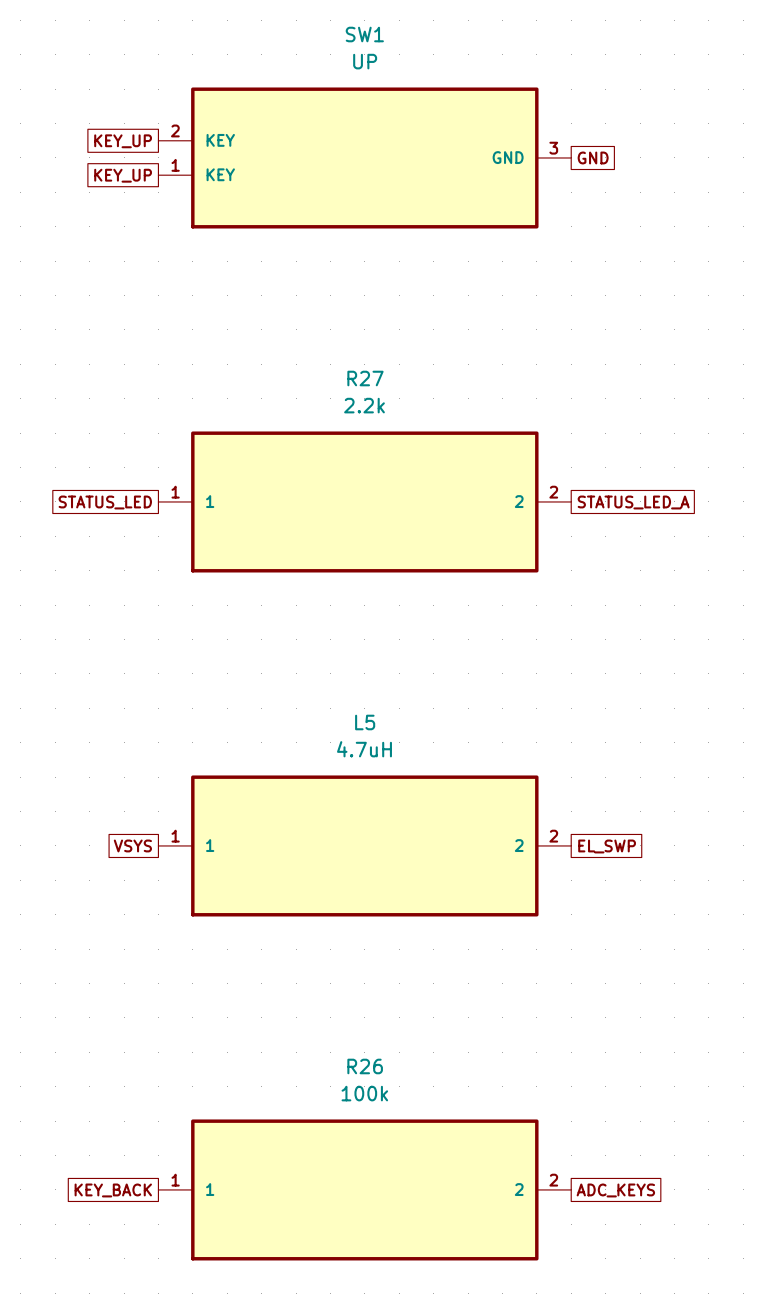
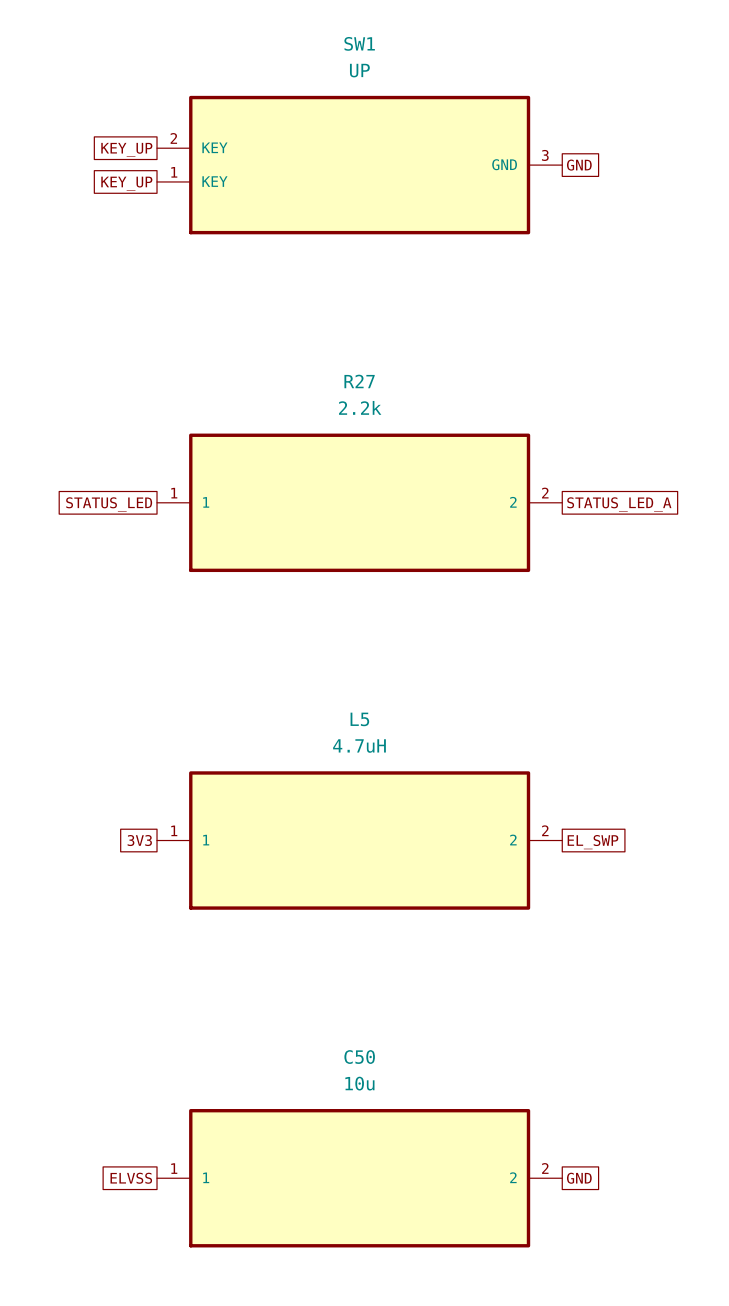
global label: VSYS (132, 845) -> 3V3 (139, 840)
R26 name: R26 (365, 1066) -> C50 (359, 1057)
R26 value: 100k (364, 1093) -> 10u (359, 1083)
global label: KEY_BACK (113, 1190) -> ELVSS (131, 1178)
global label: ADC_KEYS (615, 1190) -> GND (579, 1178)

